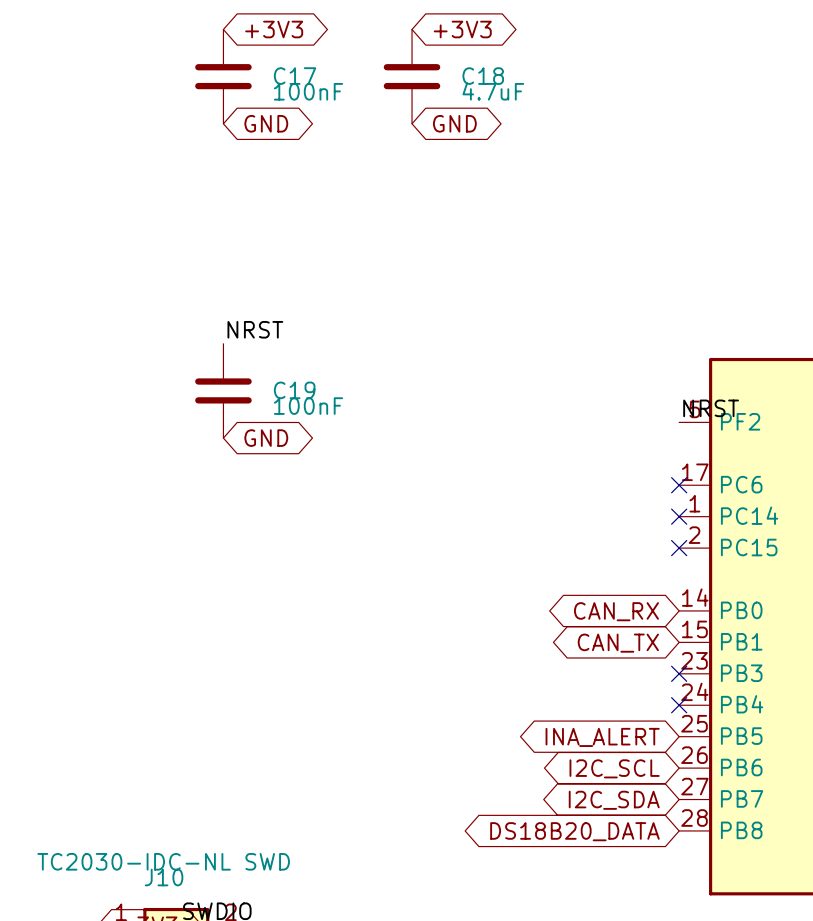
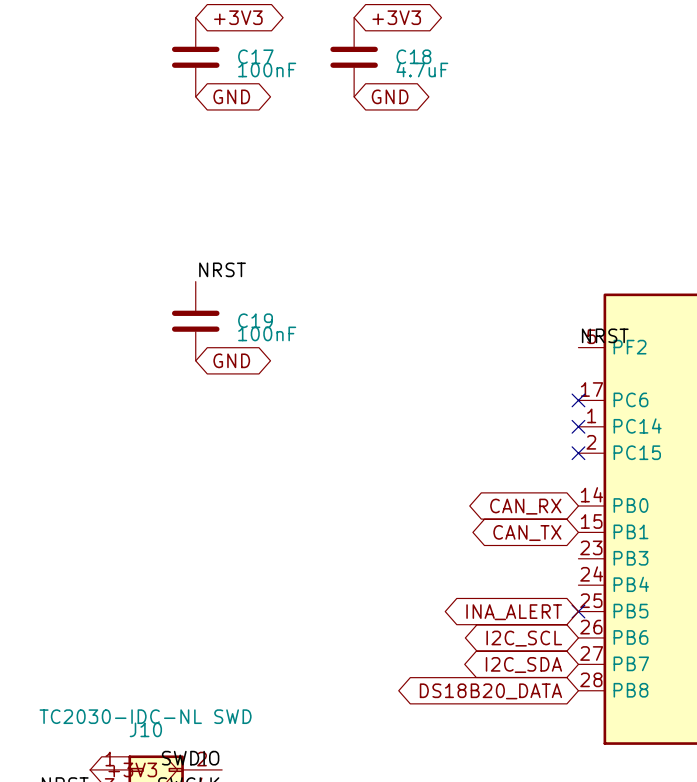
no-connect mark: (679, 673) -> none
no-connect mark: (679, 705) -> none
no-connect mark: none -> (578, 611)

